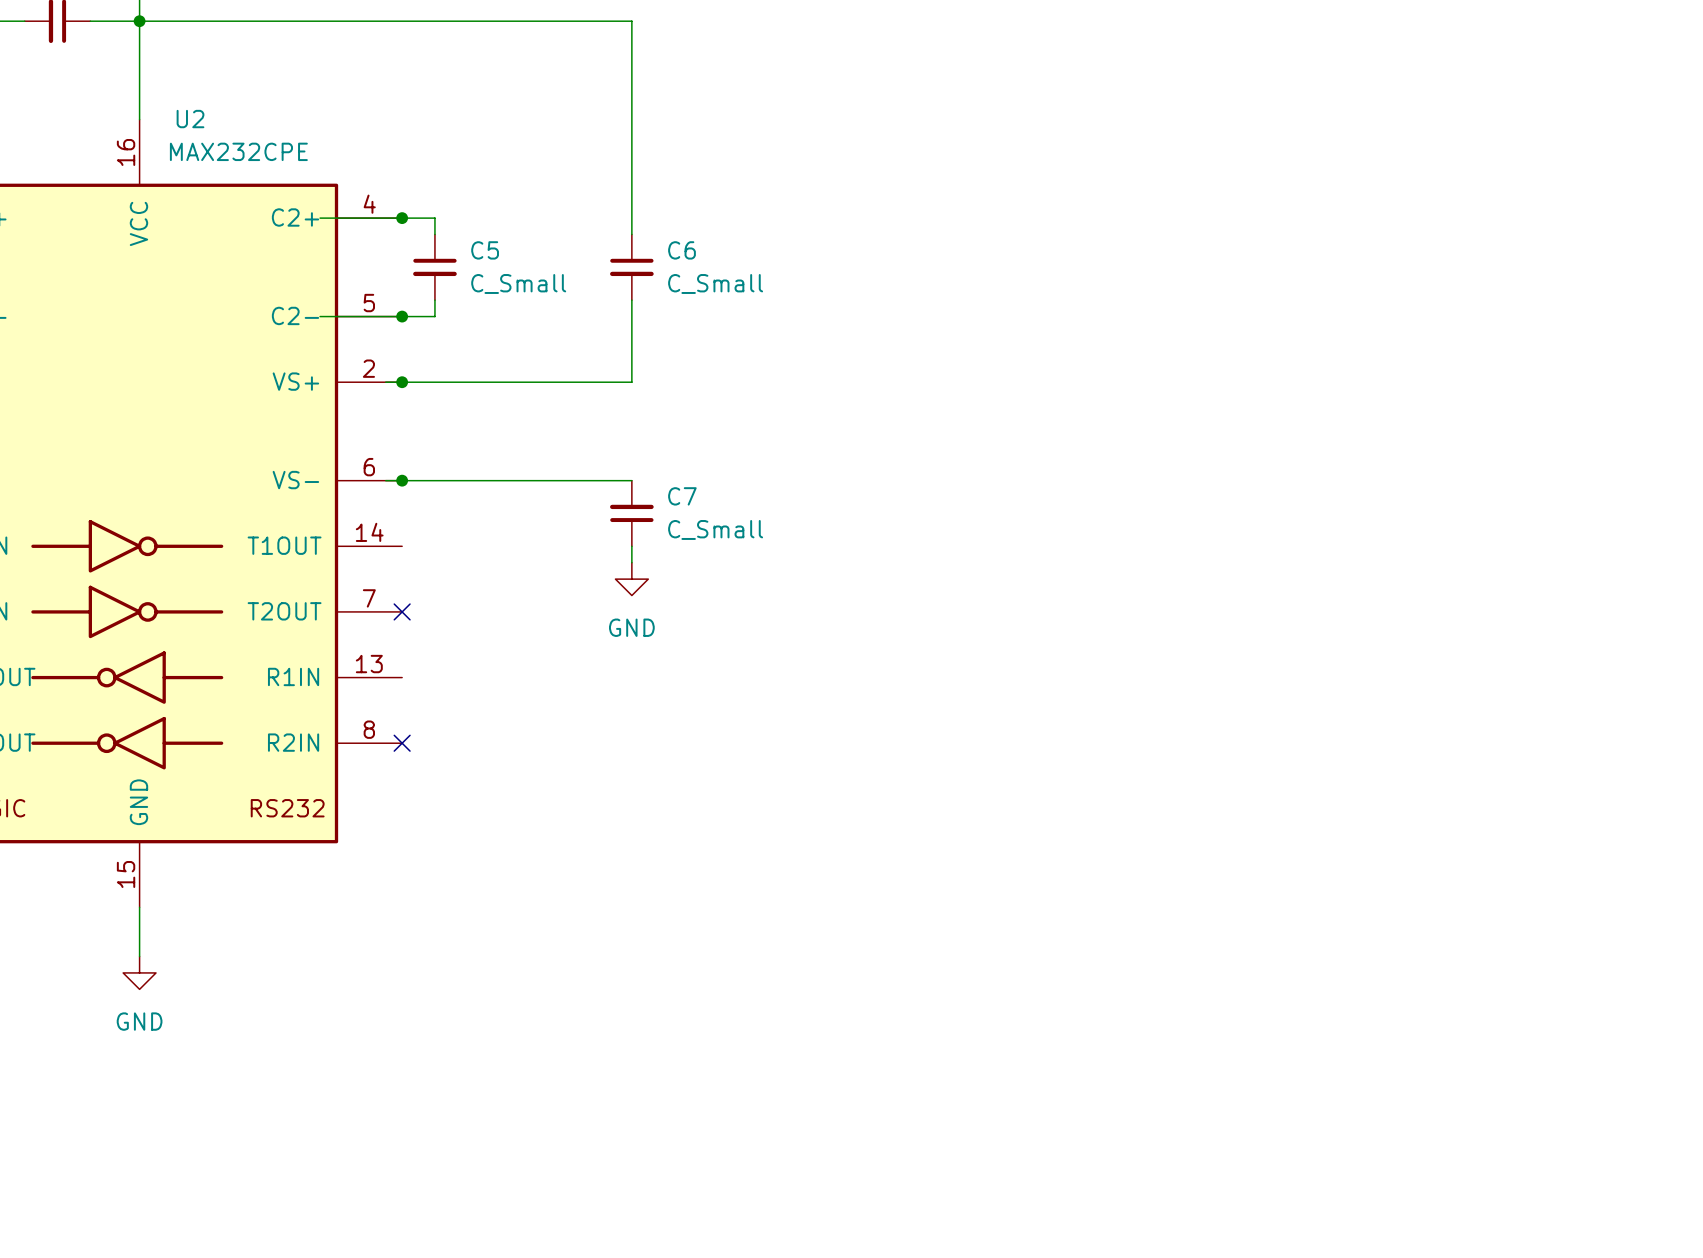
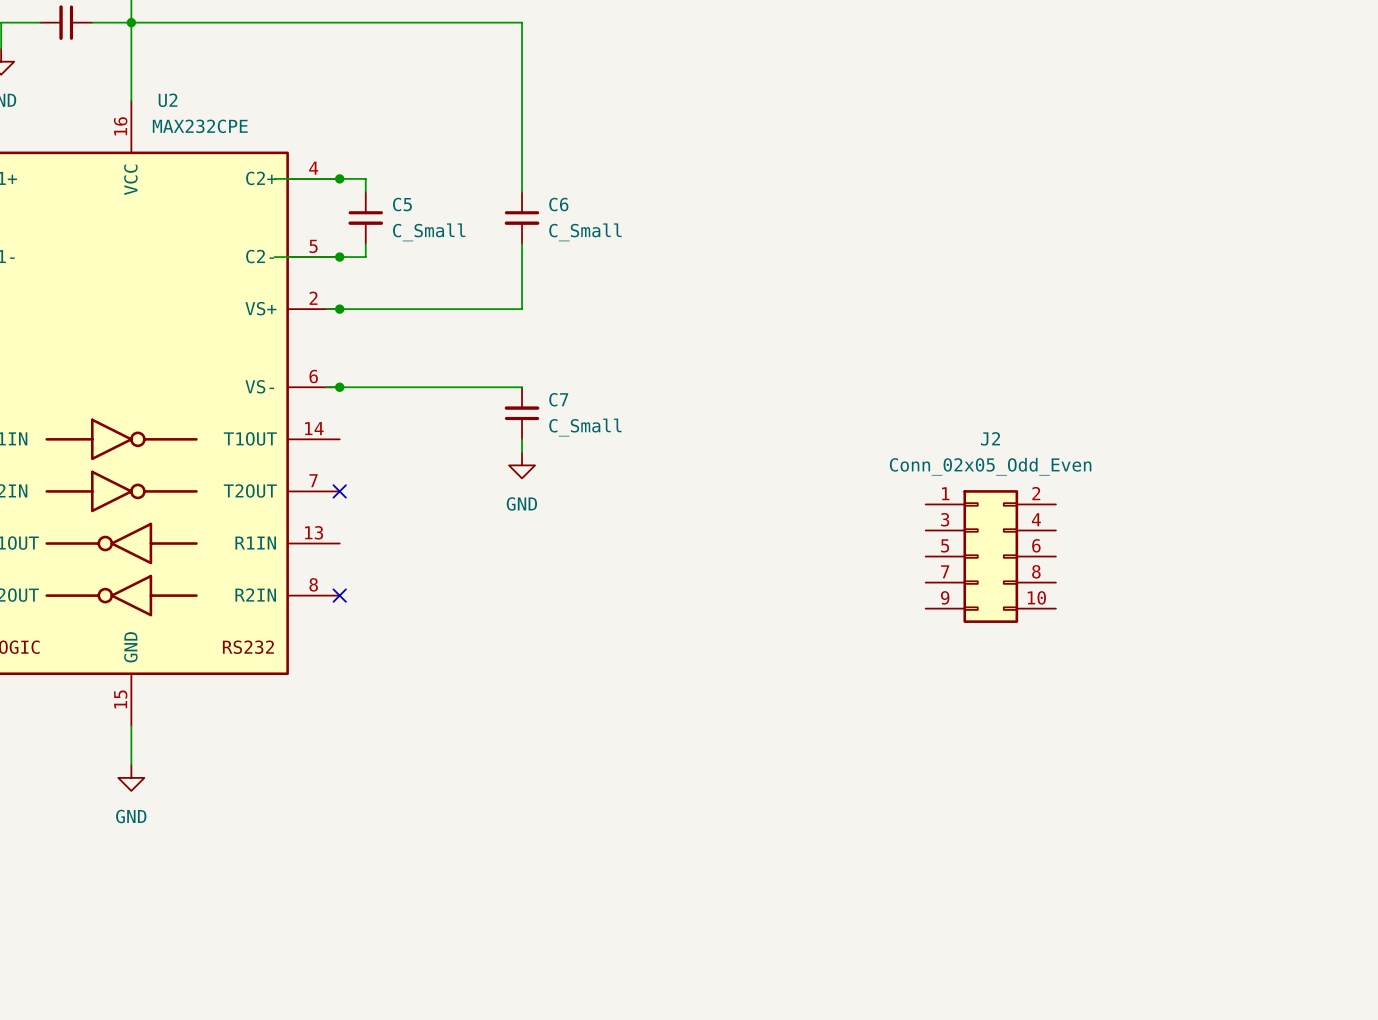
J2: none -> Conn_02x05_Odd_Even (990, 556)

